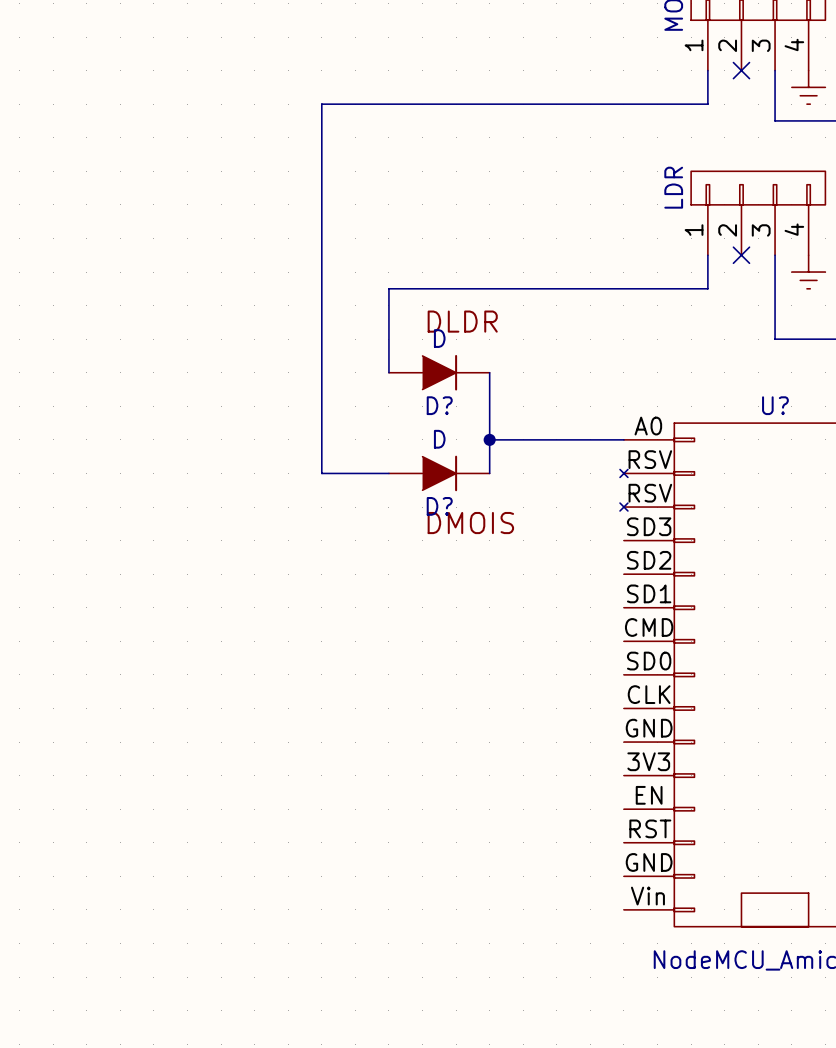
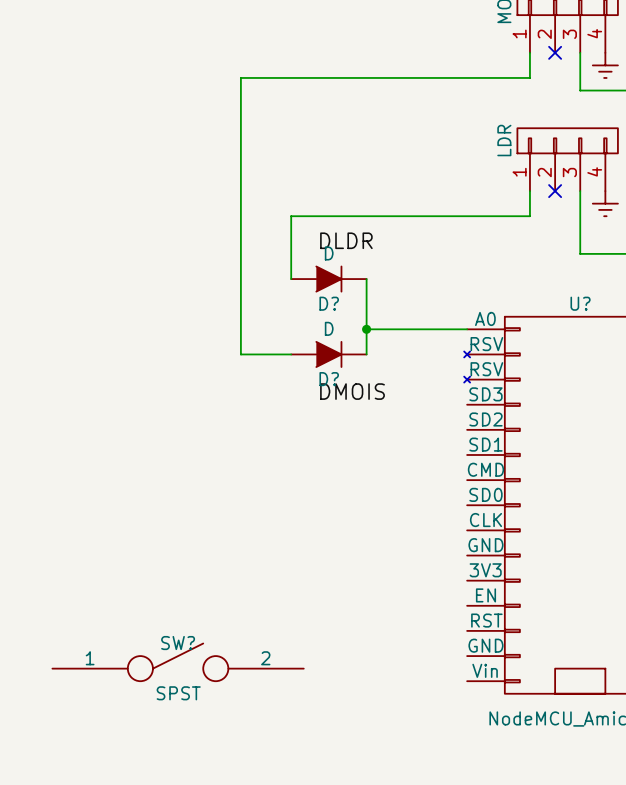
SW?: none -> SPST (178, 662)

